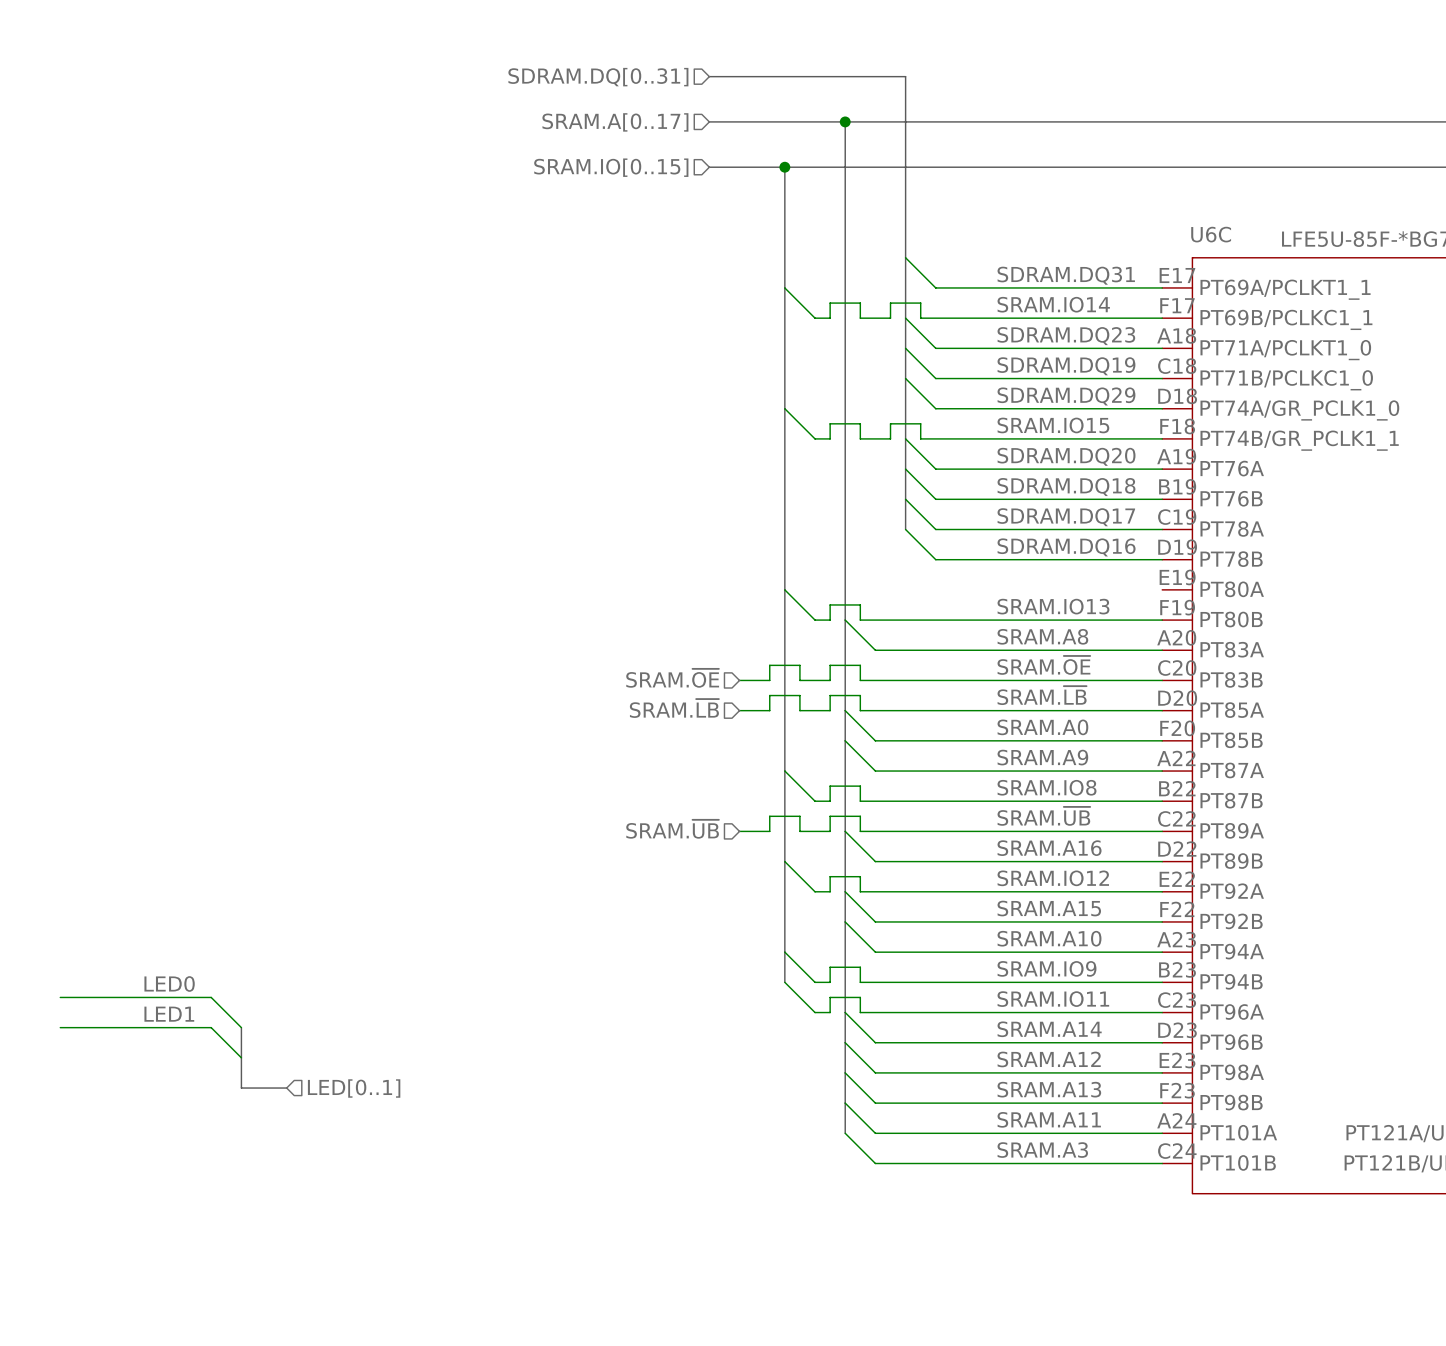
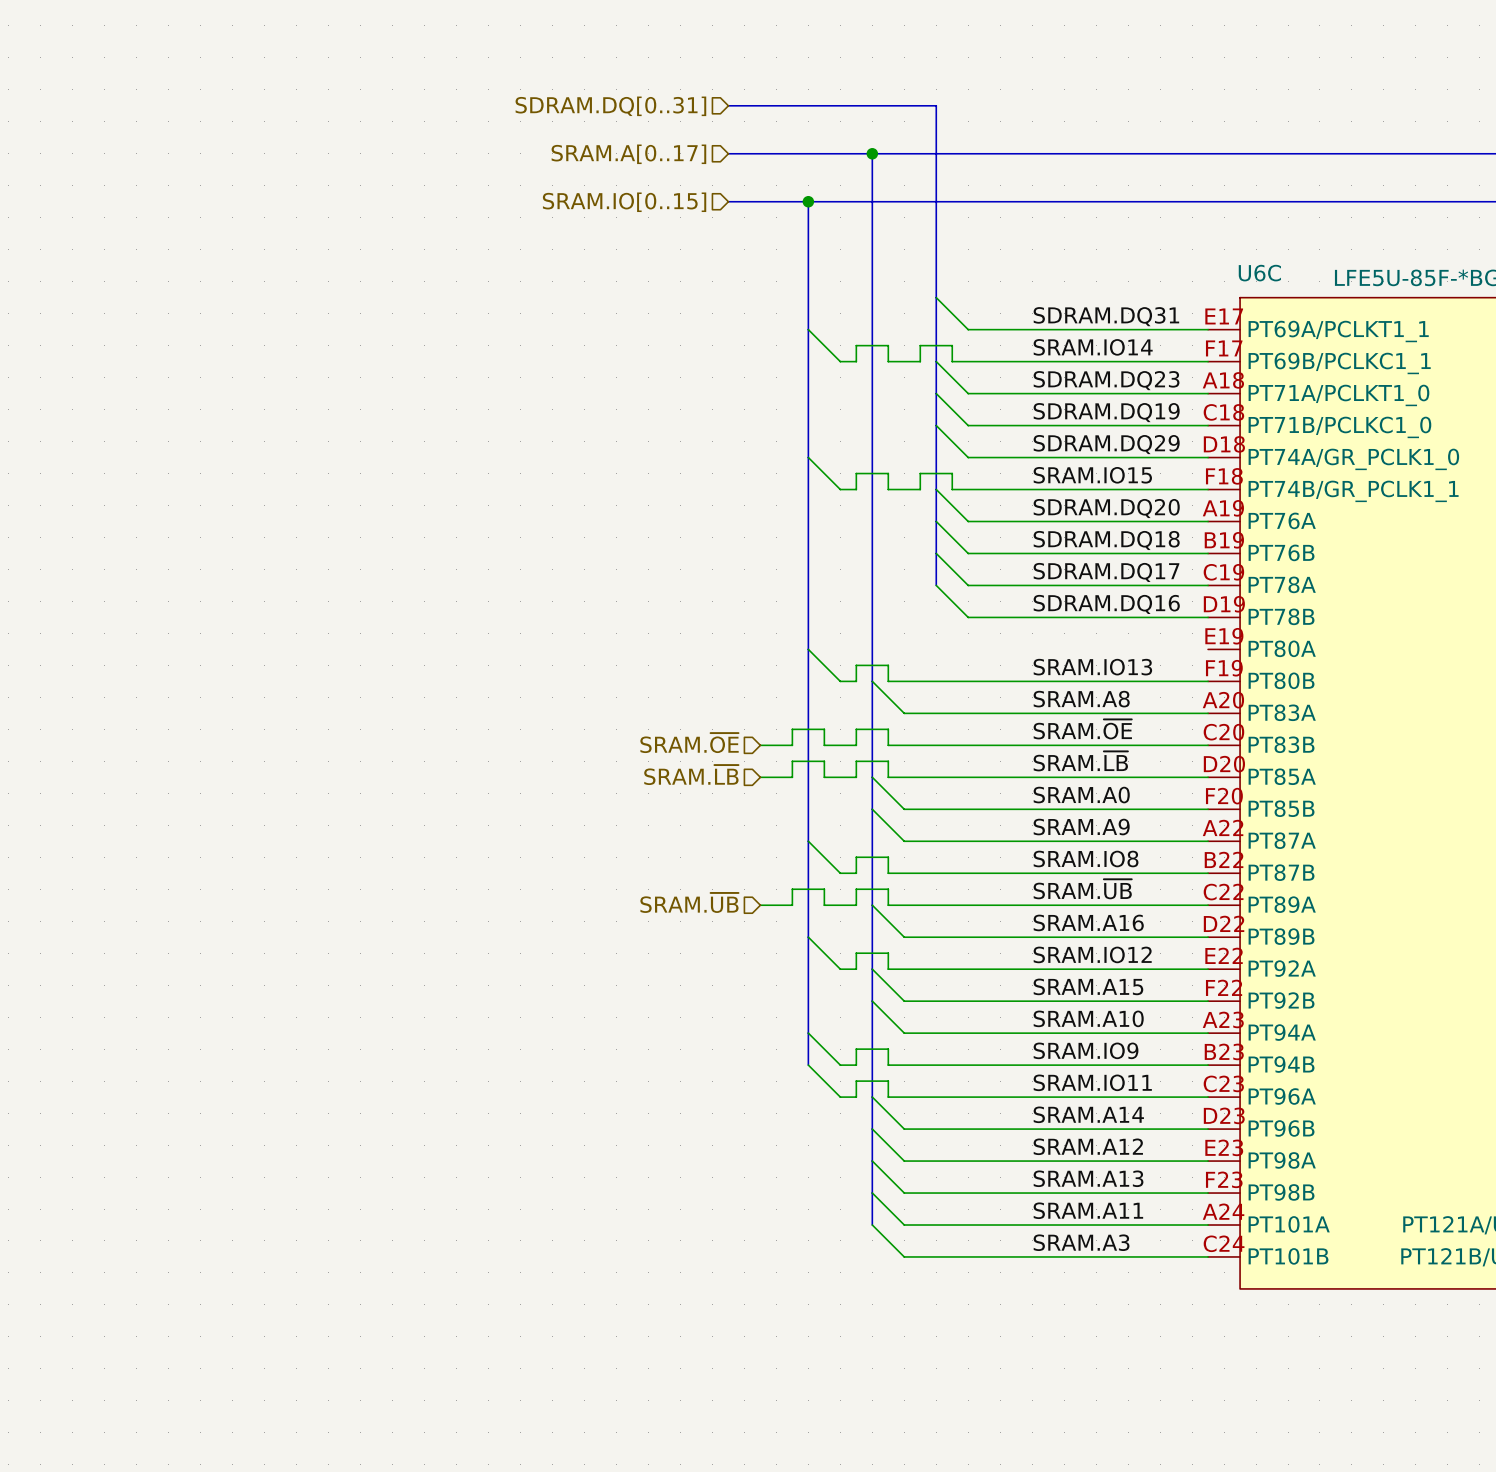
label: LED0 (169, 983) -> none
wire: (60, 997) (211, 997) (241, 1027) -> none
label: LED1 (169, 1014) -> none
wire: (60, 1027) (211, 1027) (241, 1057) -> none
bus: (241, 1027) (241, 1088) (286, 1088) -> none
hierarchical label: LED[0..1] (354, 1088) -> none

